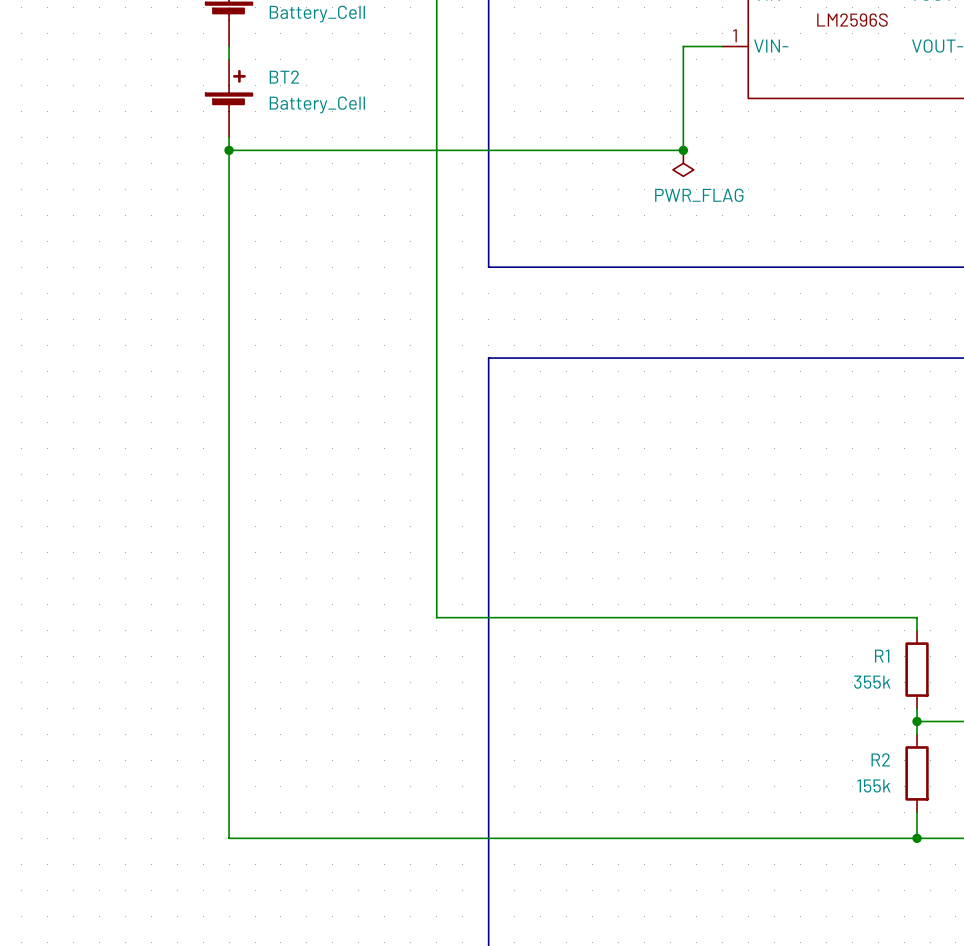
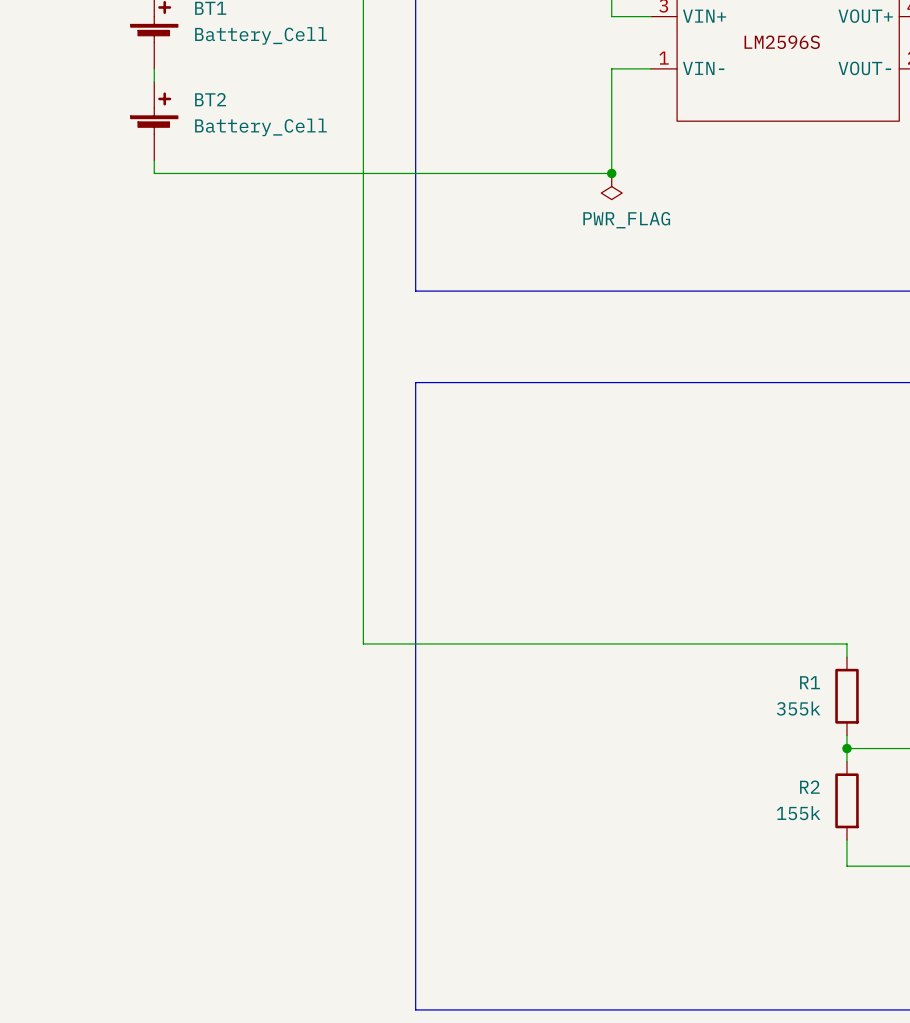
wire: (229, 150) (229, 838) (917, 838) -> none
junction: (229, 150) -> none
junction: (917, 838) -> none

